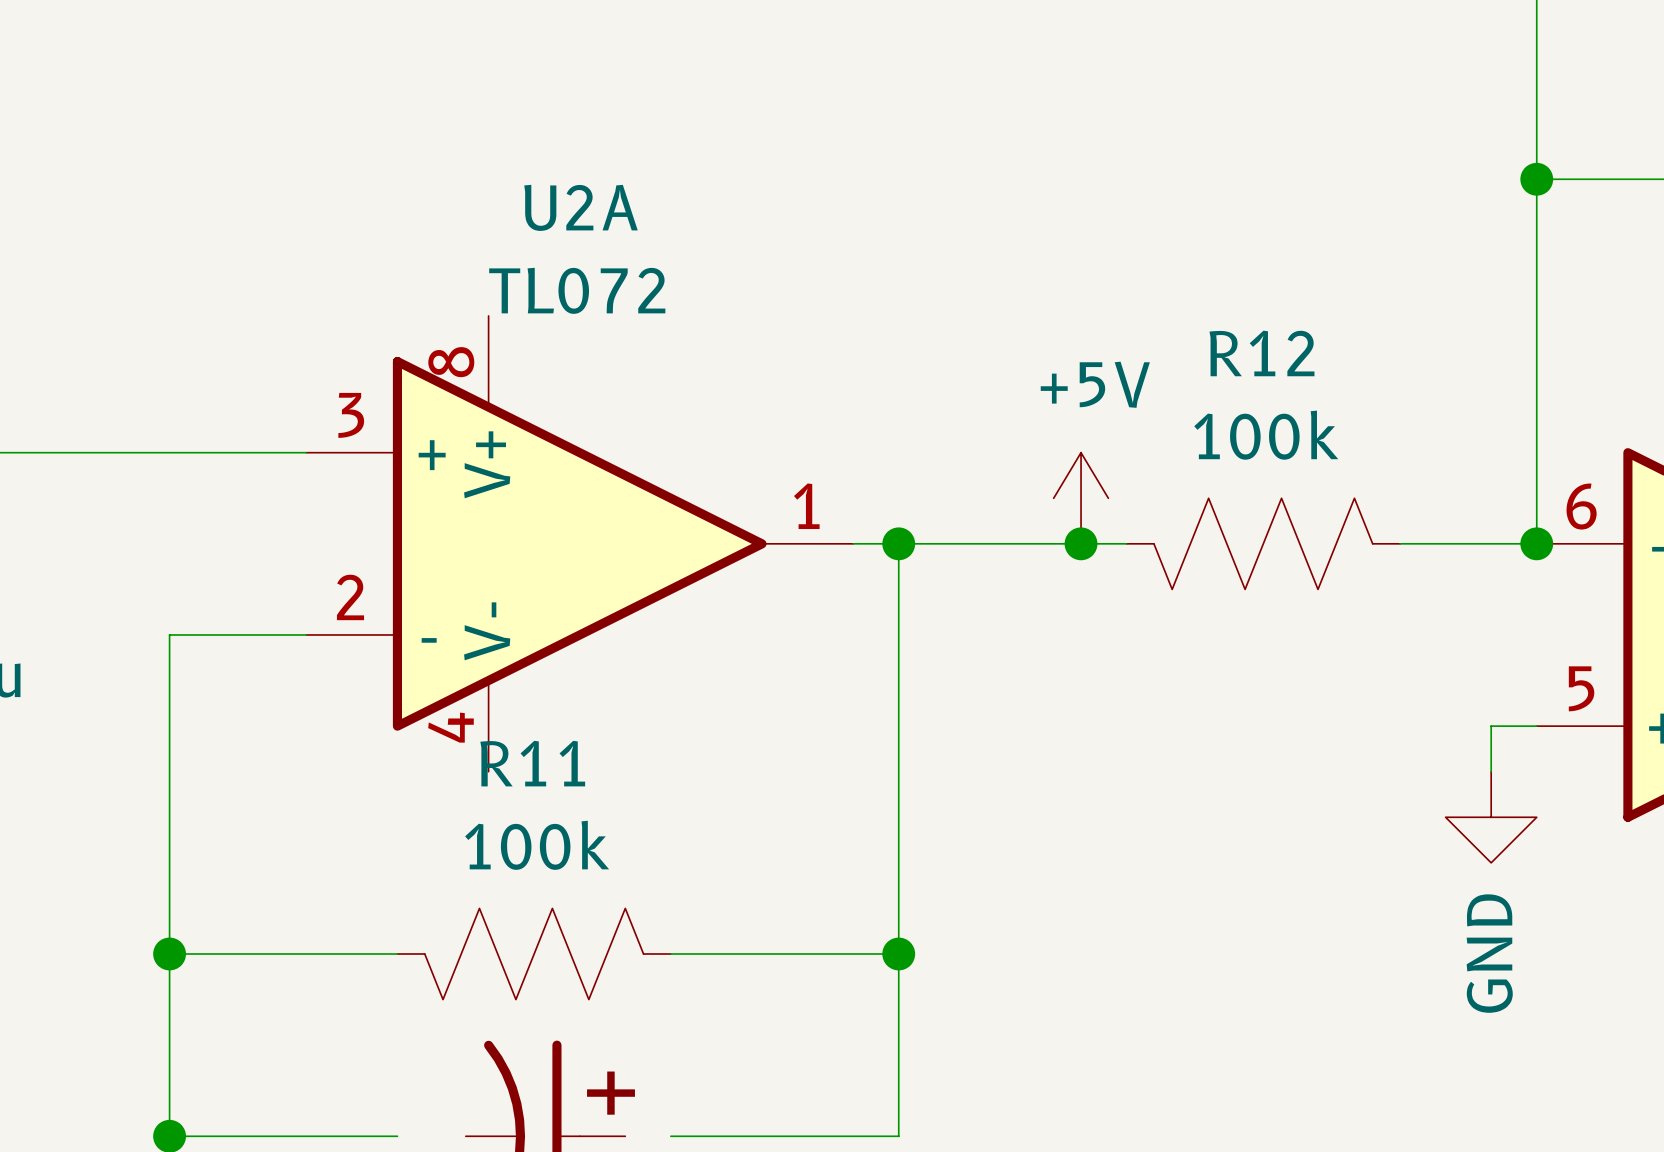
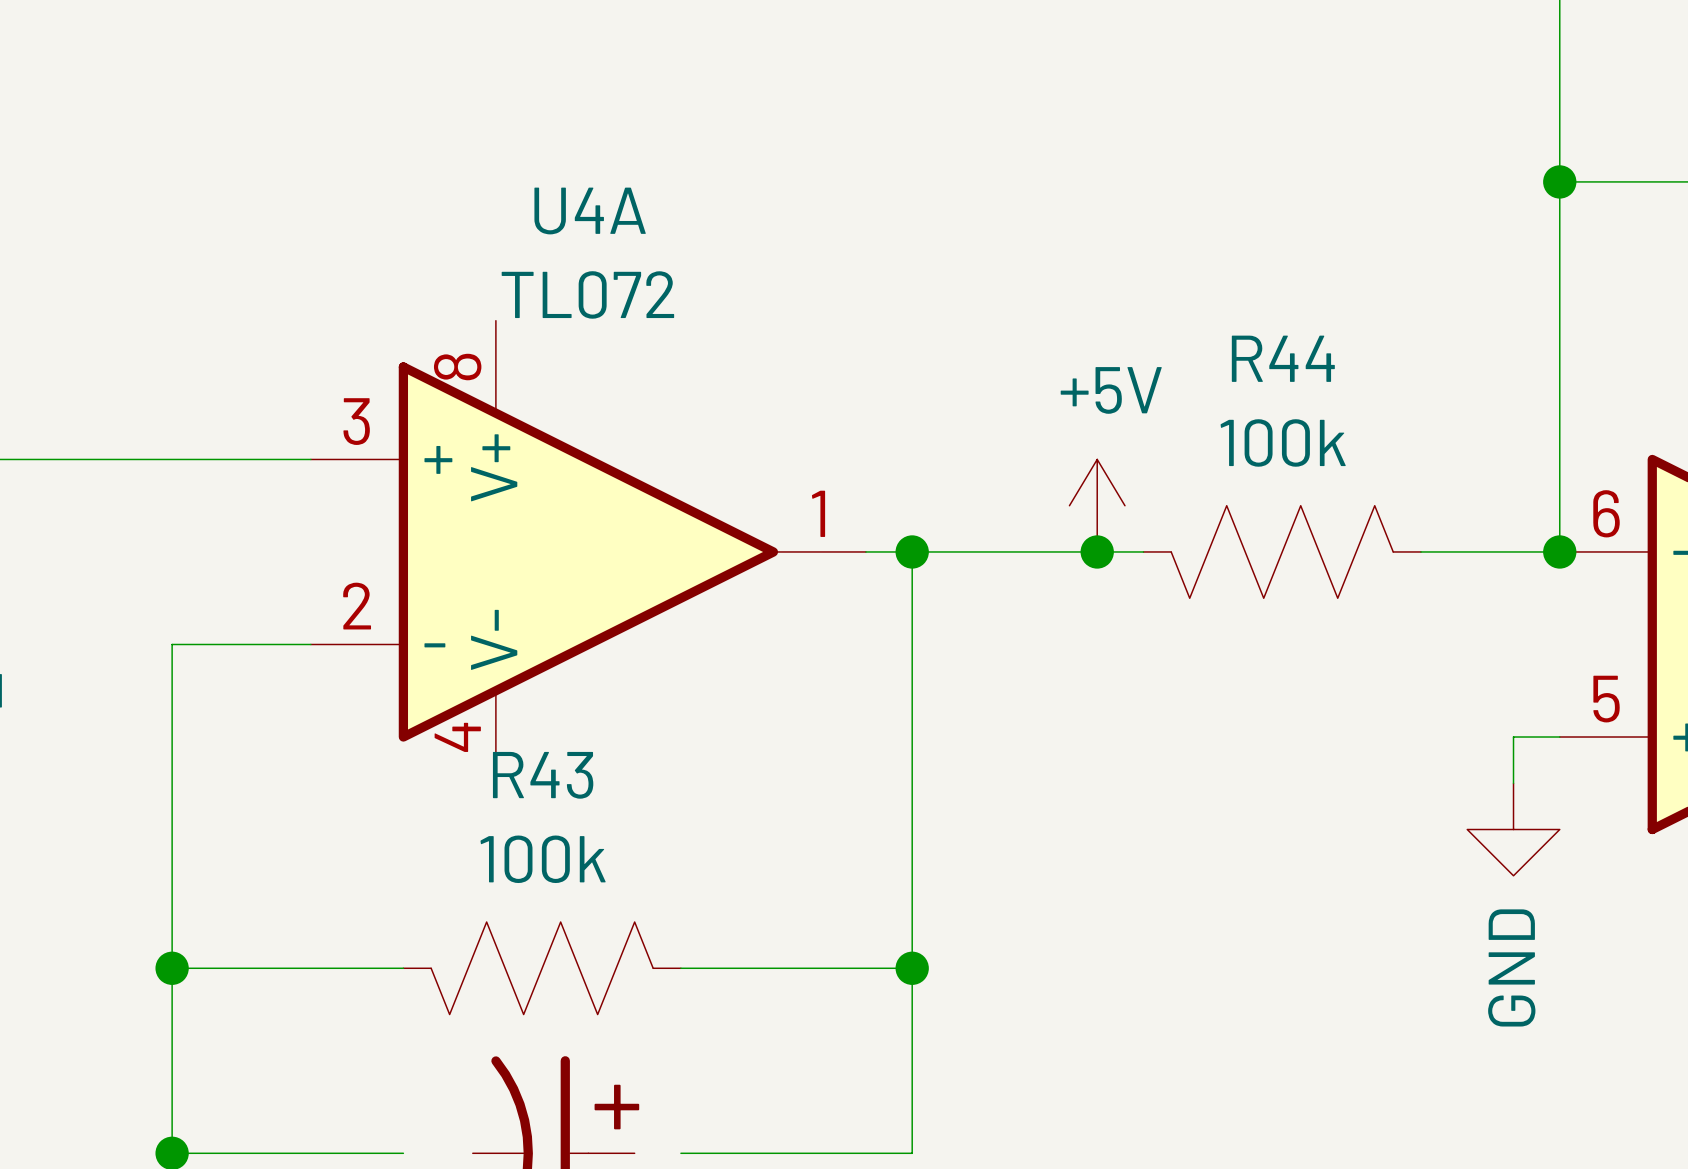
U2A name: U2A (581, 207) -> U4A (590, 211)
R12 name: R12 (1261, 353) -> R44 (1283, 358)
R11 name: R11 (532, 763) -> R43 (543, 775)

